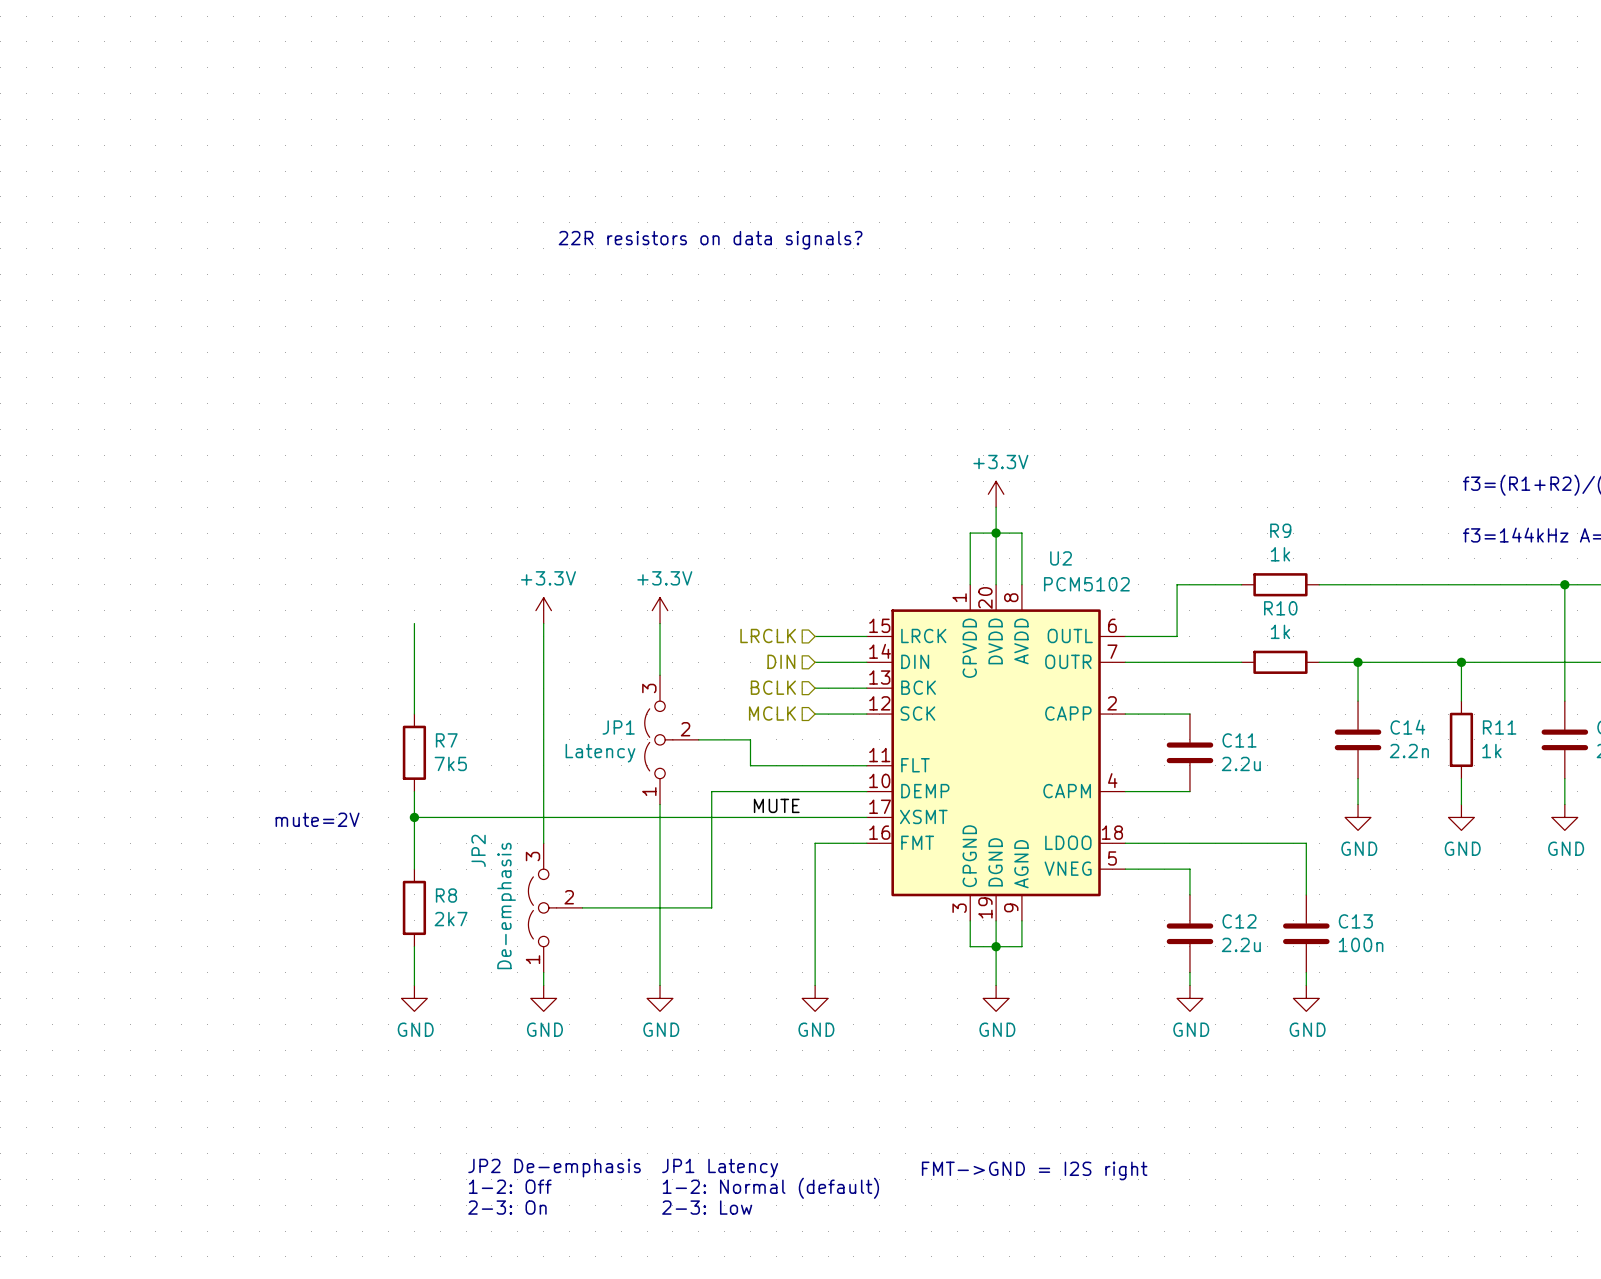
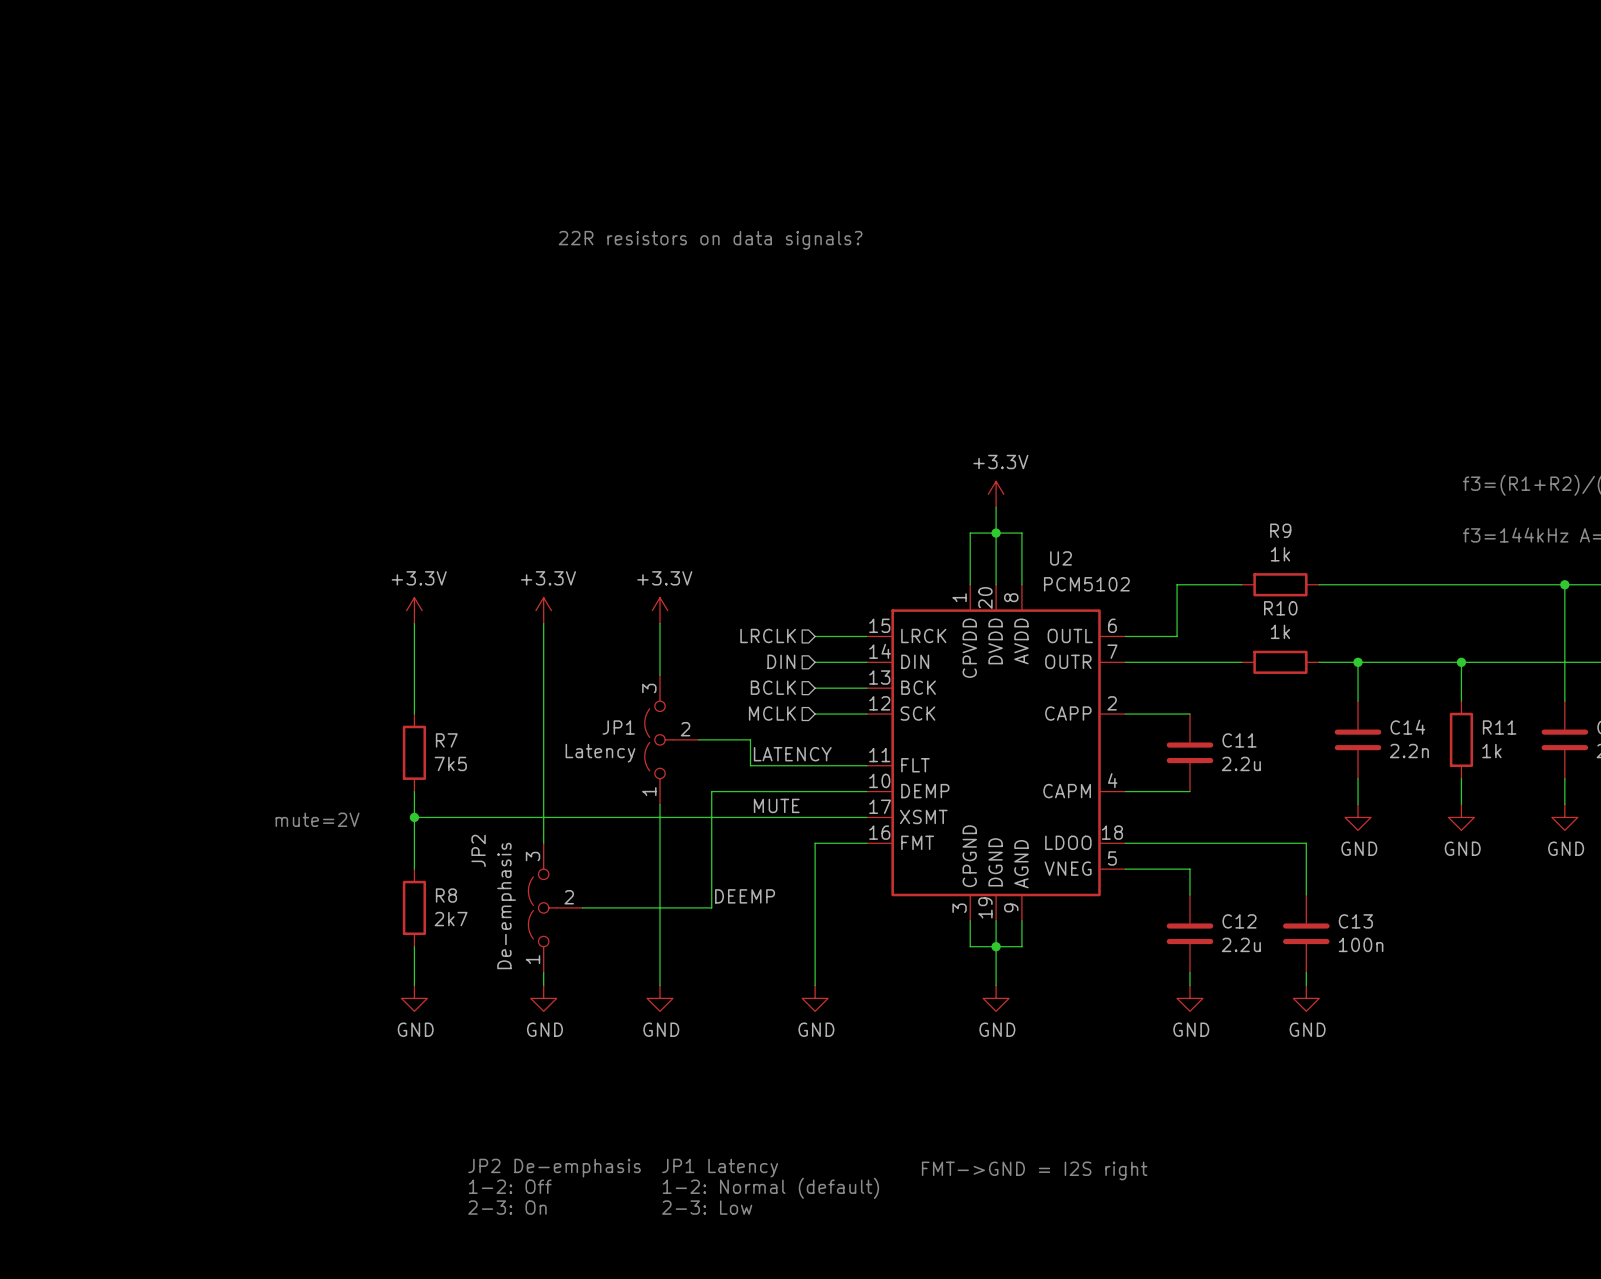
power symbol: none -> +3.3V (414, 610)
label: none -> LATENCY (792, 754)
label: none -> DEEMP (745, 896)

